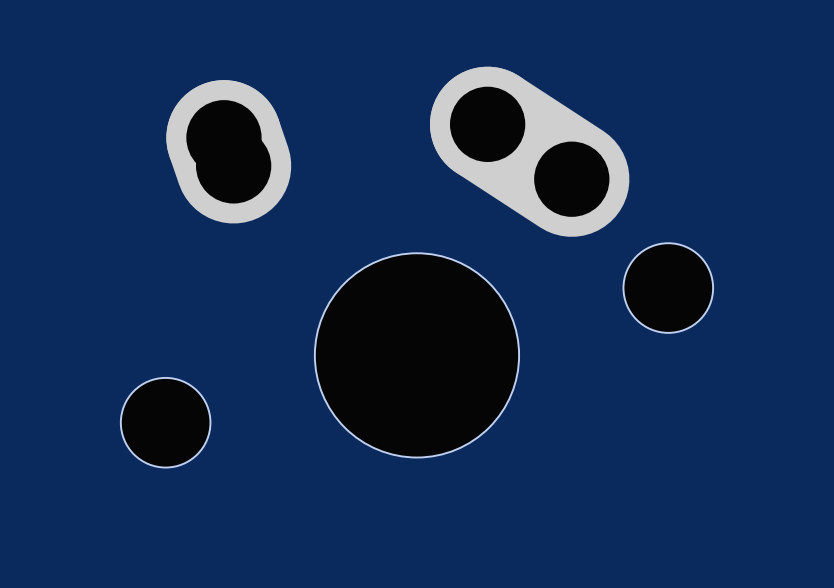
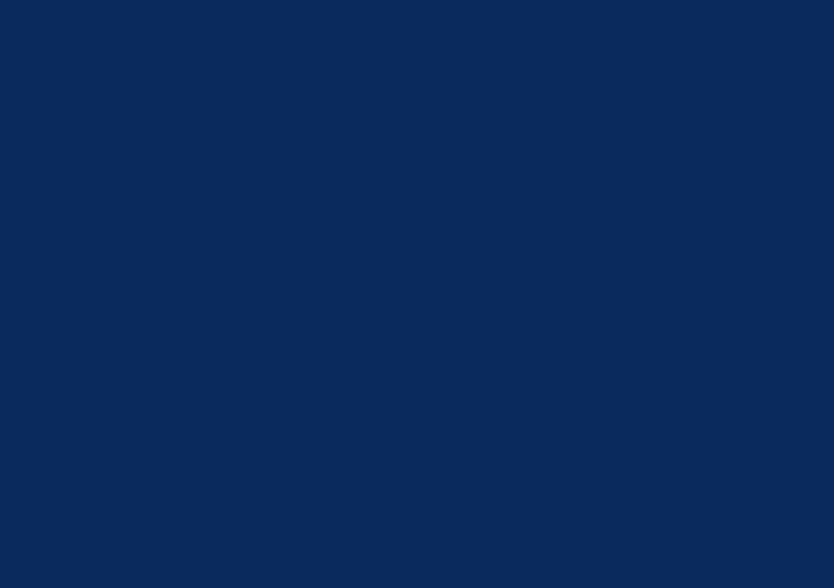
part: (416, 267) -> none

